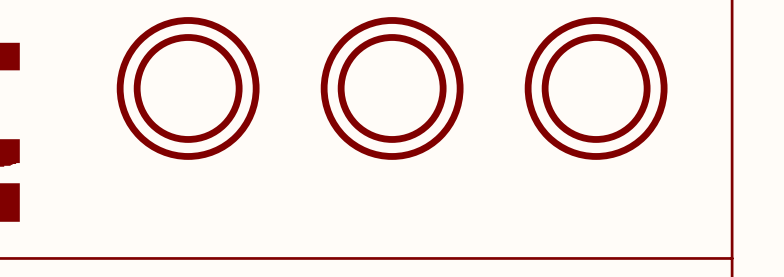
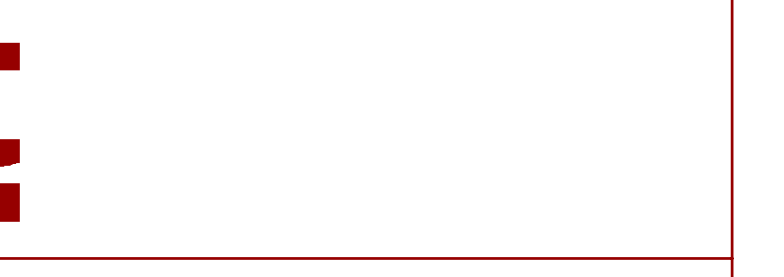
part: (188, 88) -> none
part: (392, 88) -> none
part: (596, 88) -> none

